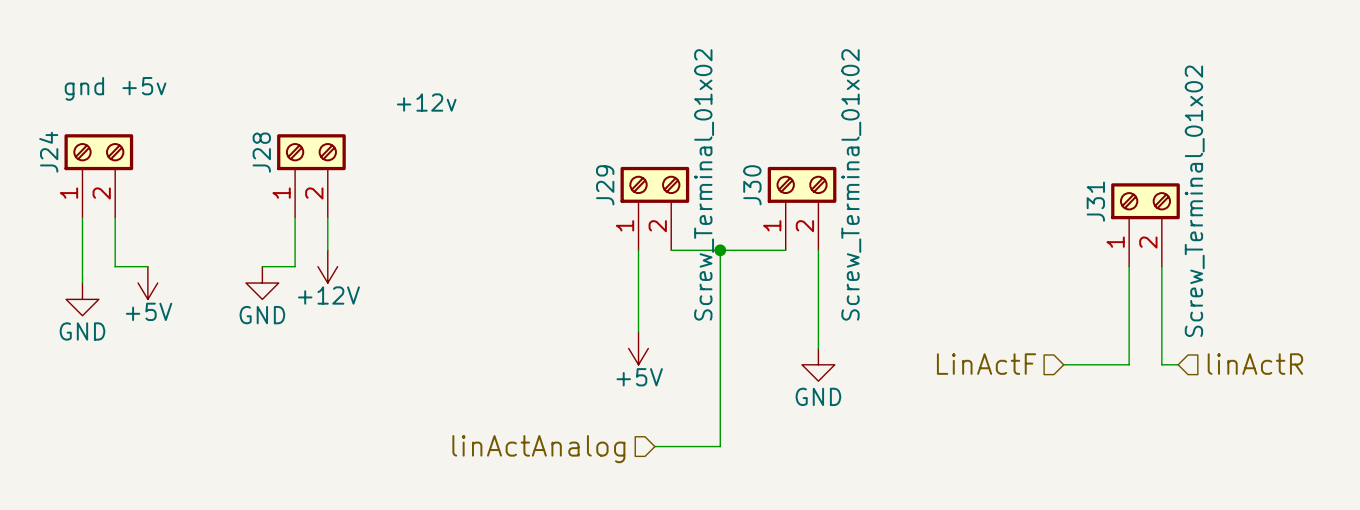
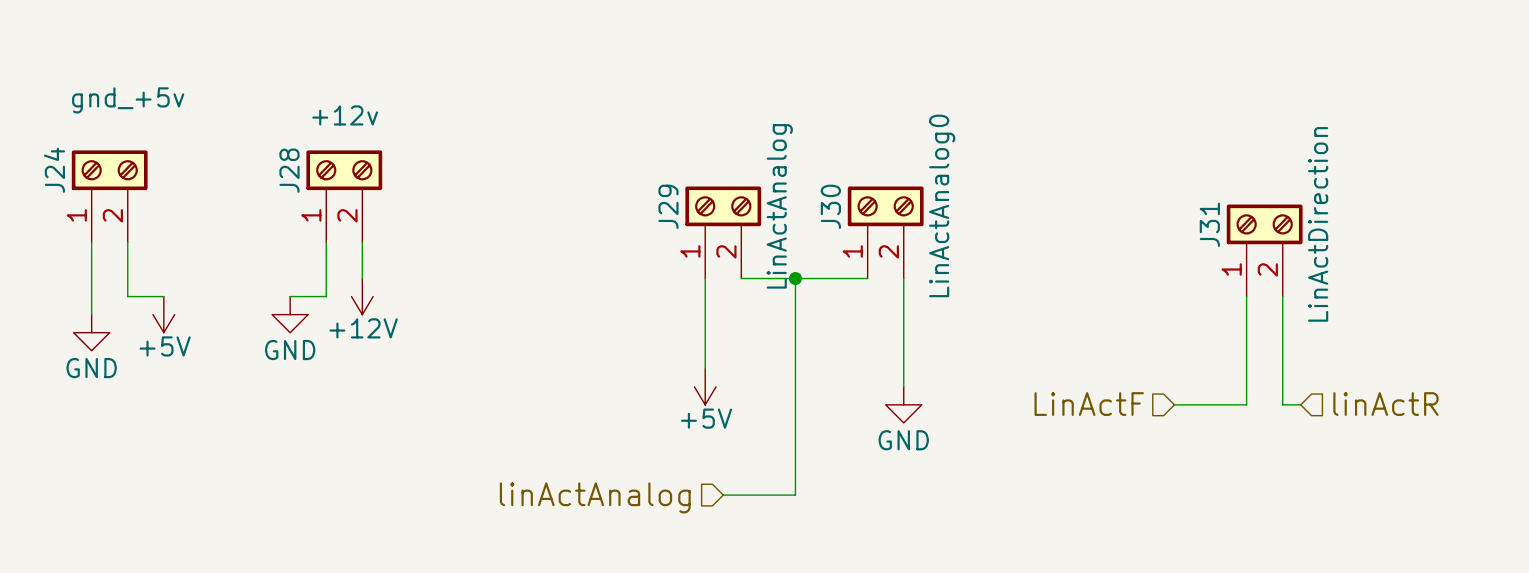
J24 value: gnd +5v (115, 88) -> gnd_+5v (128, 100)
J28 value position: +12v (426, 102) -> +12v (345, 115)
J29 value: Screw_Terminal_01x02 (704, 184) -> LinActAnalog (779, 206)
J30 value: Screw_Terminal_01x02 (851, 184) -> LinActAnalog0 (942, 205)
J31 value: Screw_Terminal_01x02 (1194, 201) -> LinActDirection (1318, 224)

